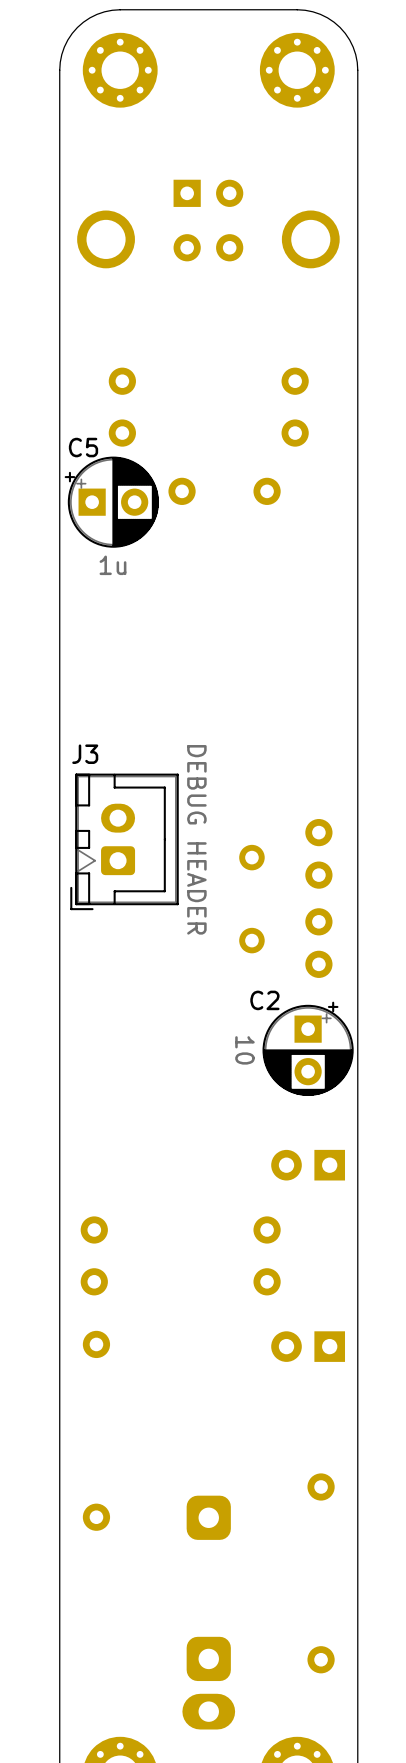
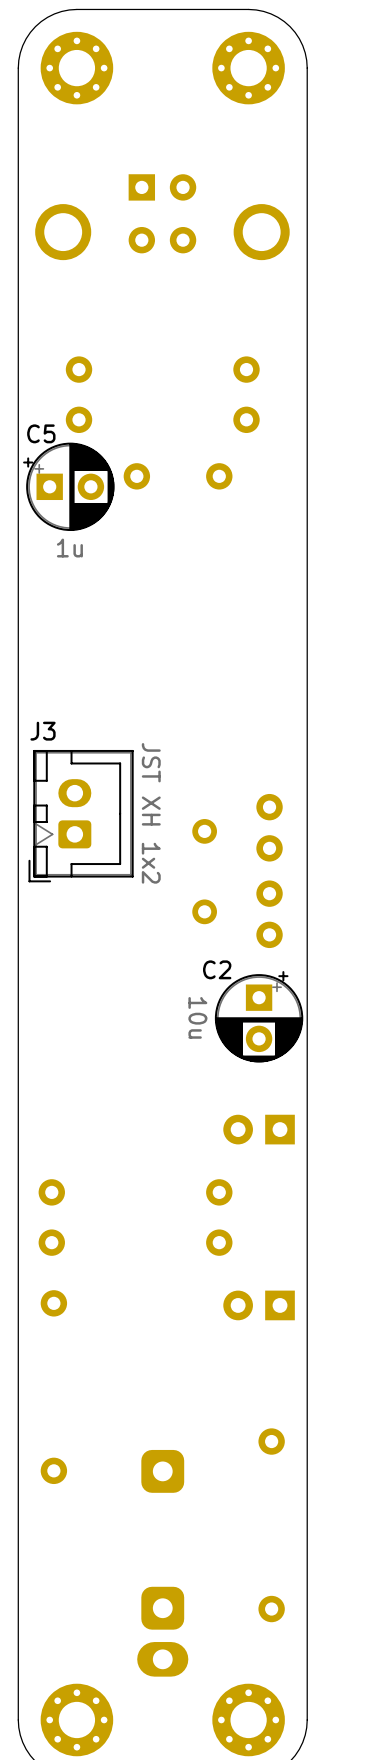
J3 value: DEBUG HEADER (196, 839) -> JST XH 1x2 (151, 813)
C2 value: 10 (244, 1050) -> 10u (197, 1017)

